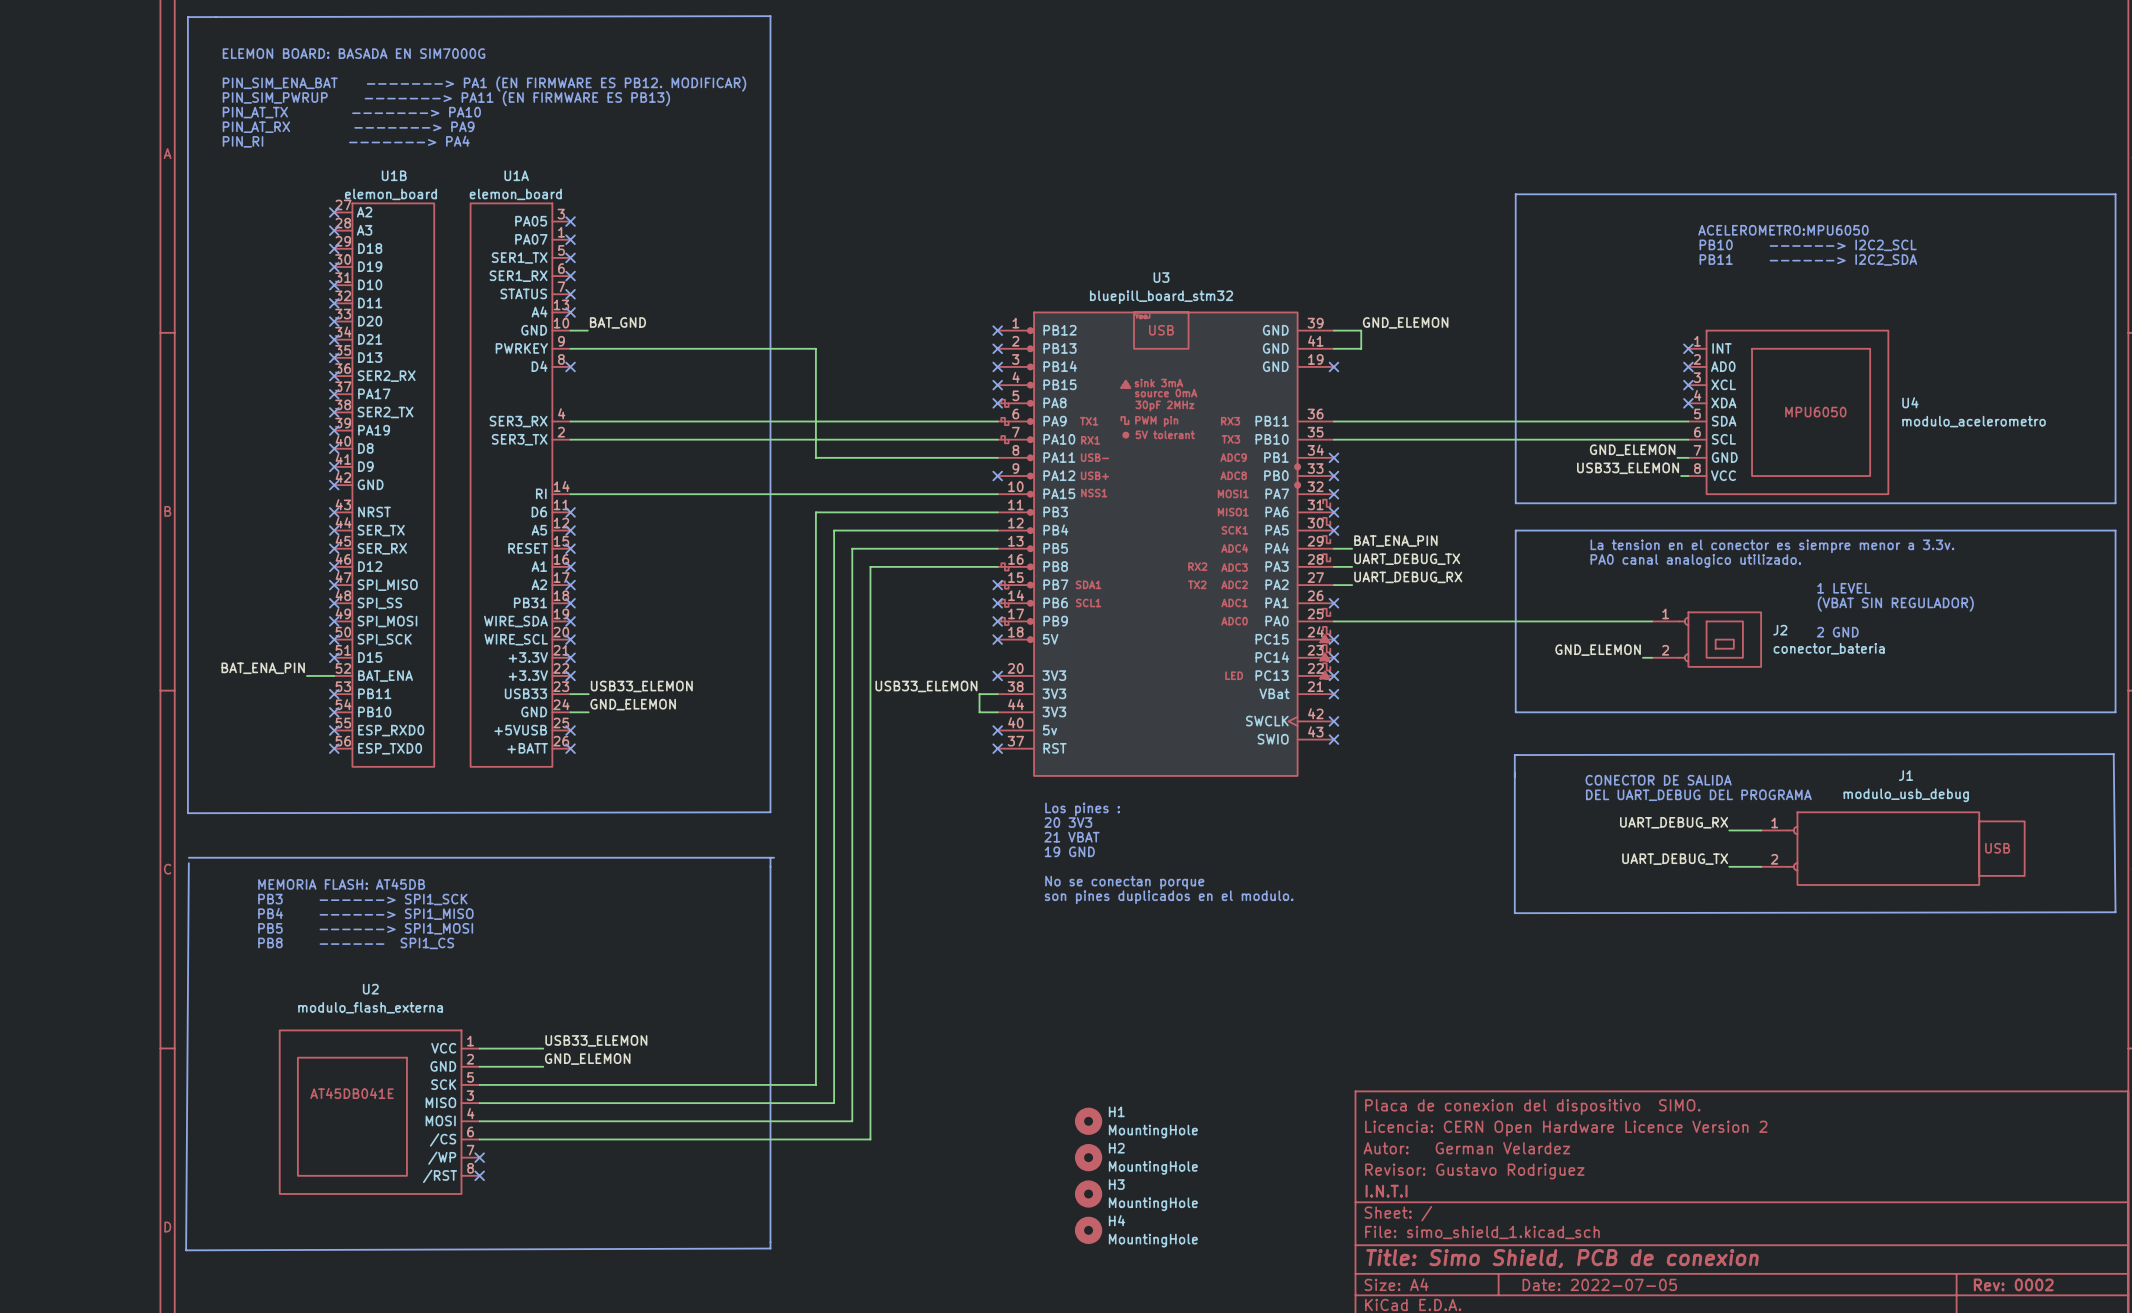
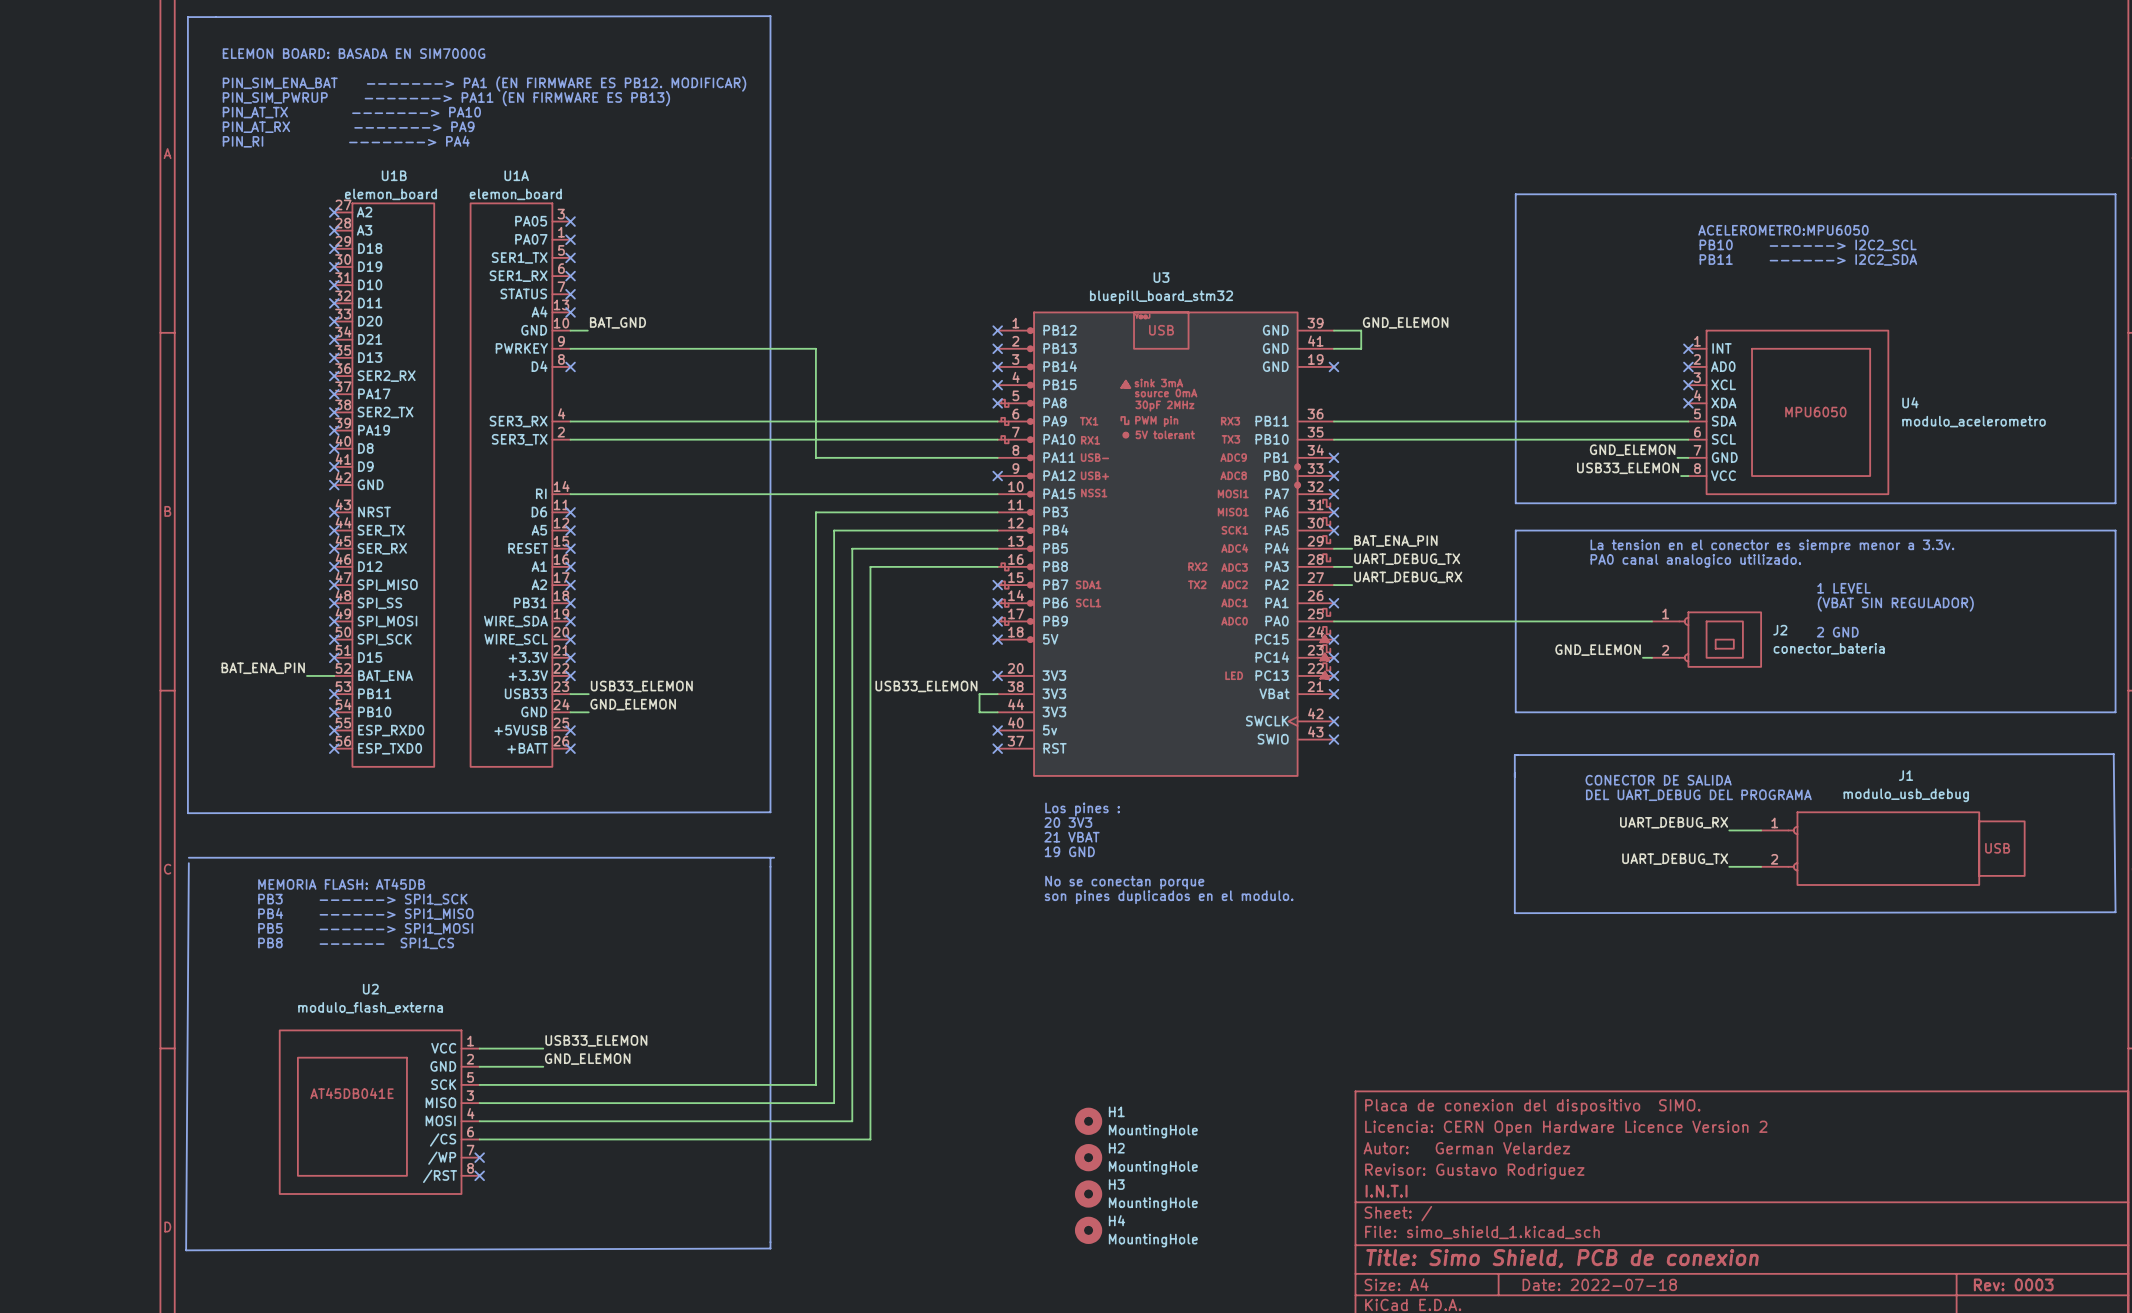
title block: Date: 2022-07-05 (1599, 1284) -> Date: 2022-07-18 (1599, 1284)
title block: Rev: 0002 (2013, 1284) -> Rev: 0003 (2013, 1284)

